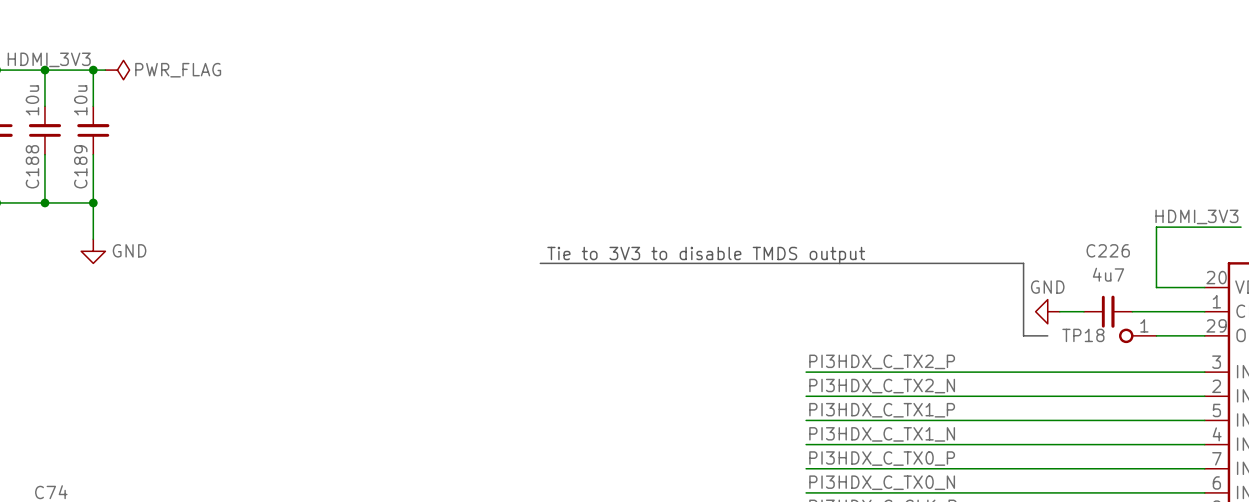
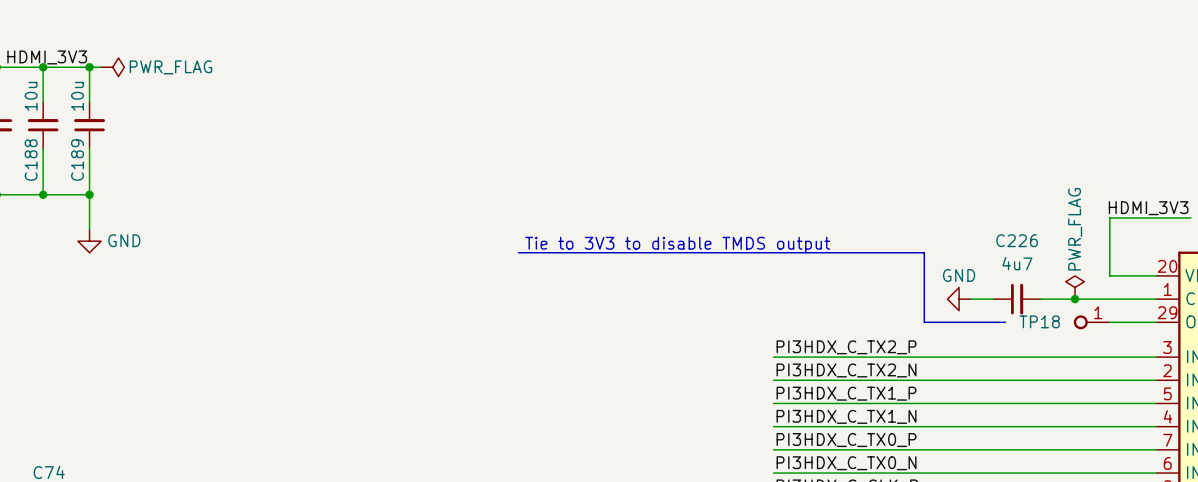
line: (963, 263) (1023, 263) (1023, 335) -> (924, 252) (924, 322) (982, 322)
power symbol: none -> PWR_FLAG (1075, 287)
wire: none -> (970, 299) (993, 299)
power symbol position: GND (1047, 311) -> GND (959, 299)
C226 position: (1108, 311) -> (1017, 299)
junction: none -> (1075, 299)

